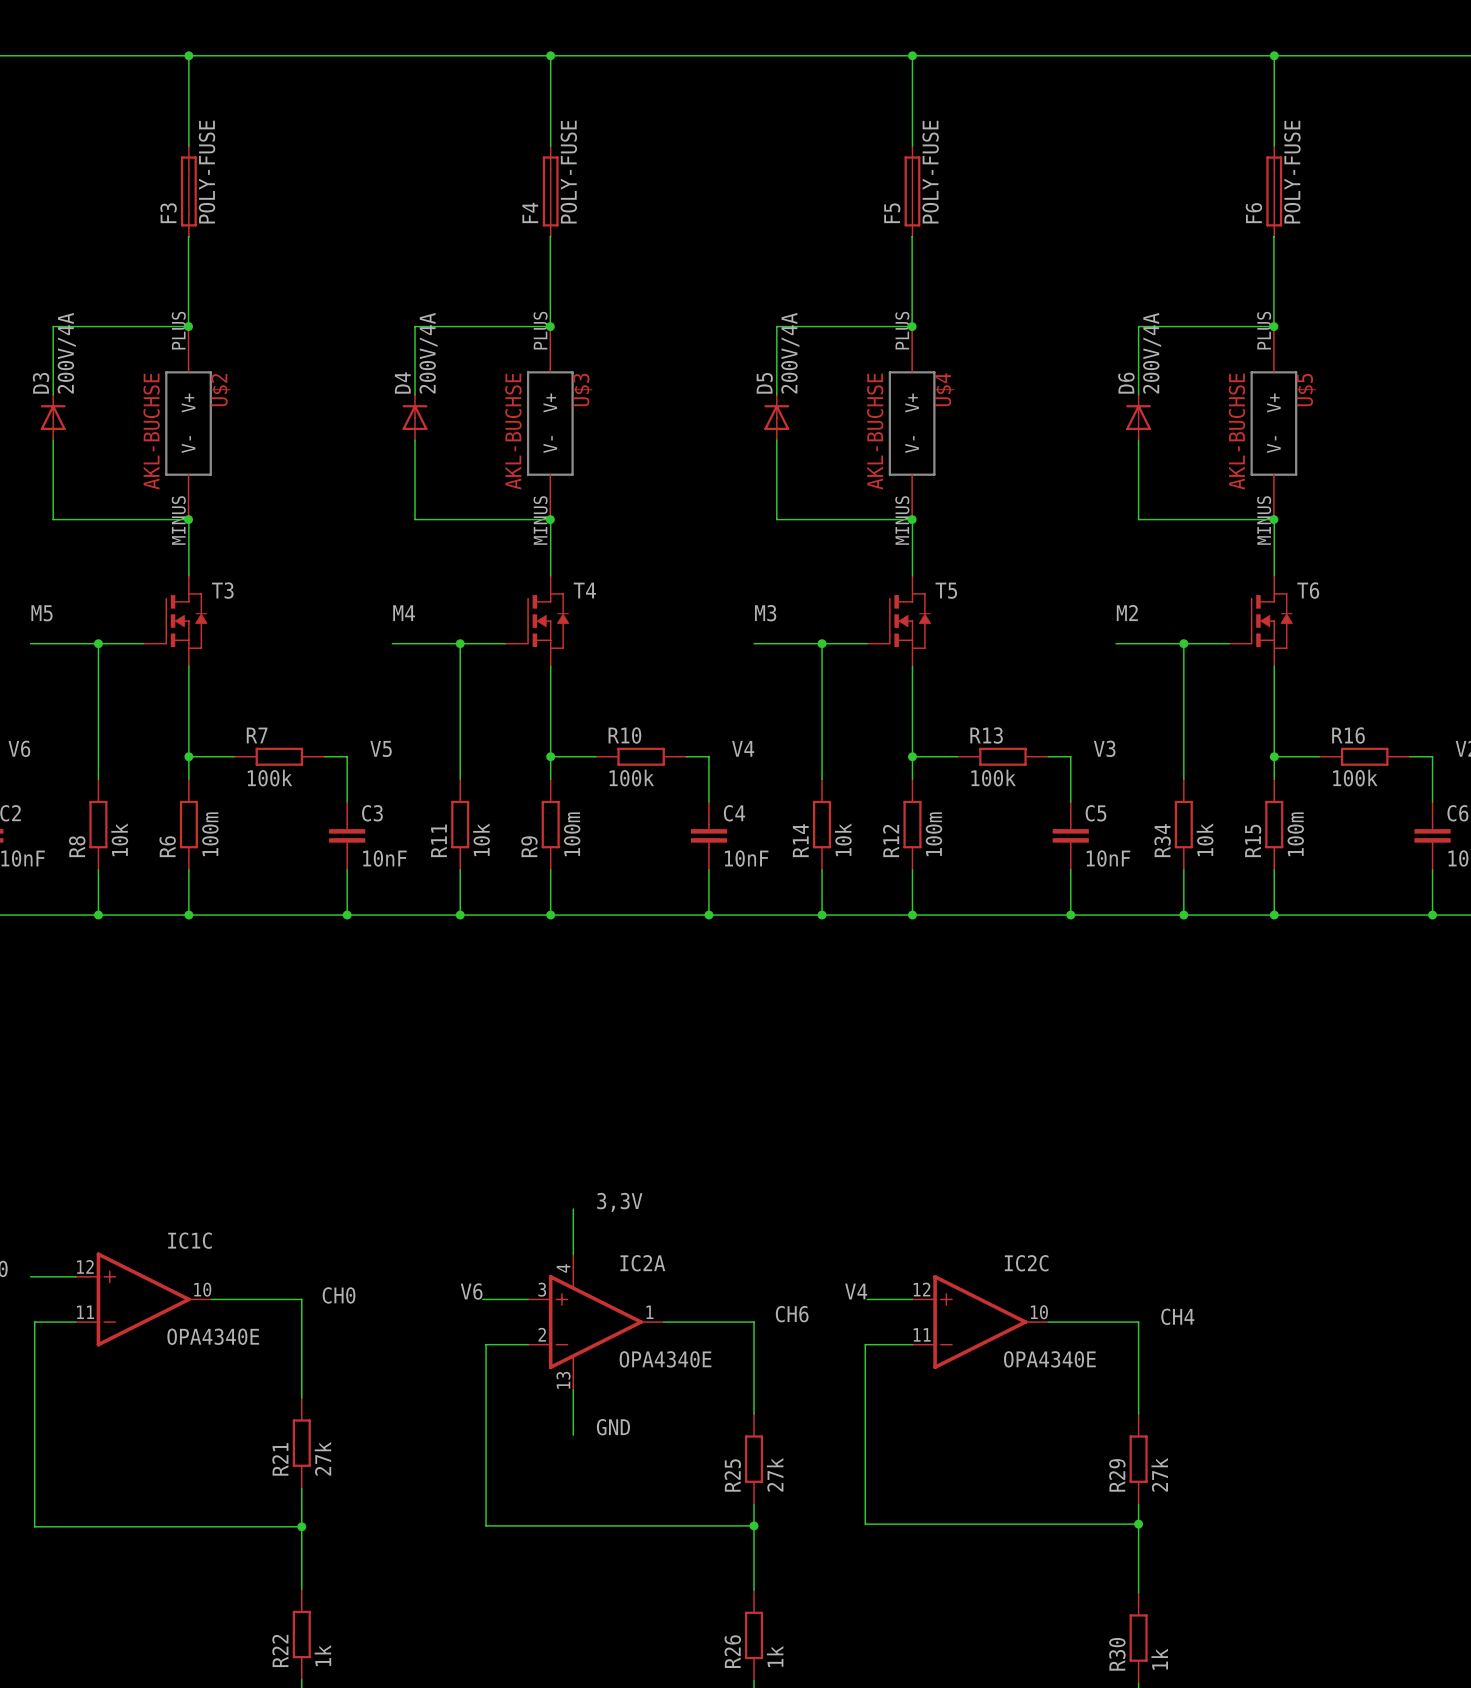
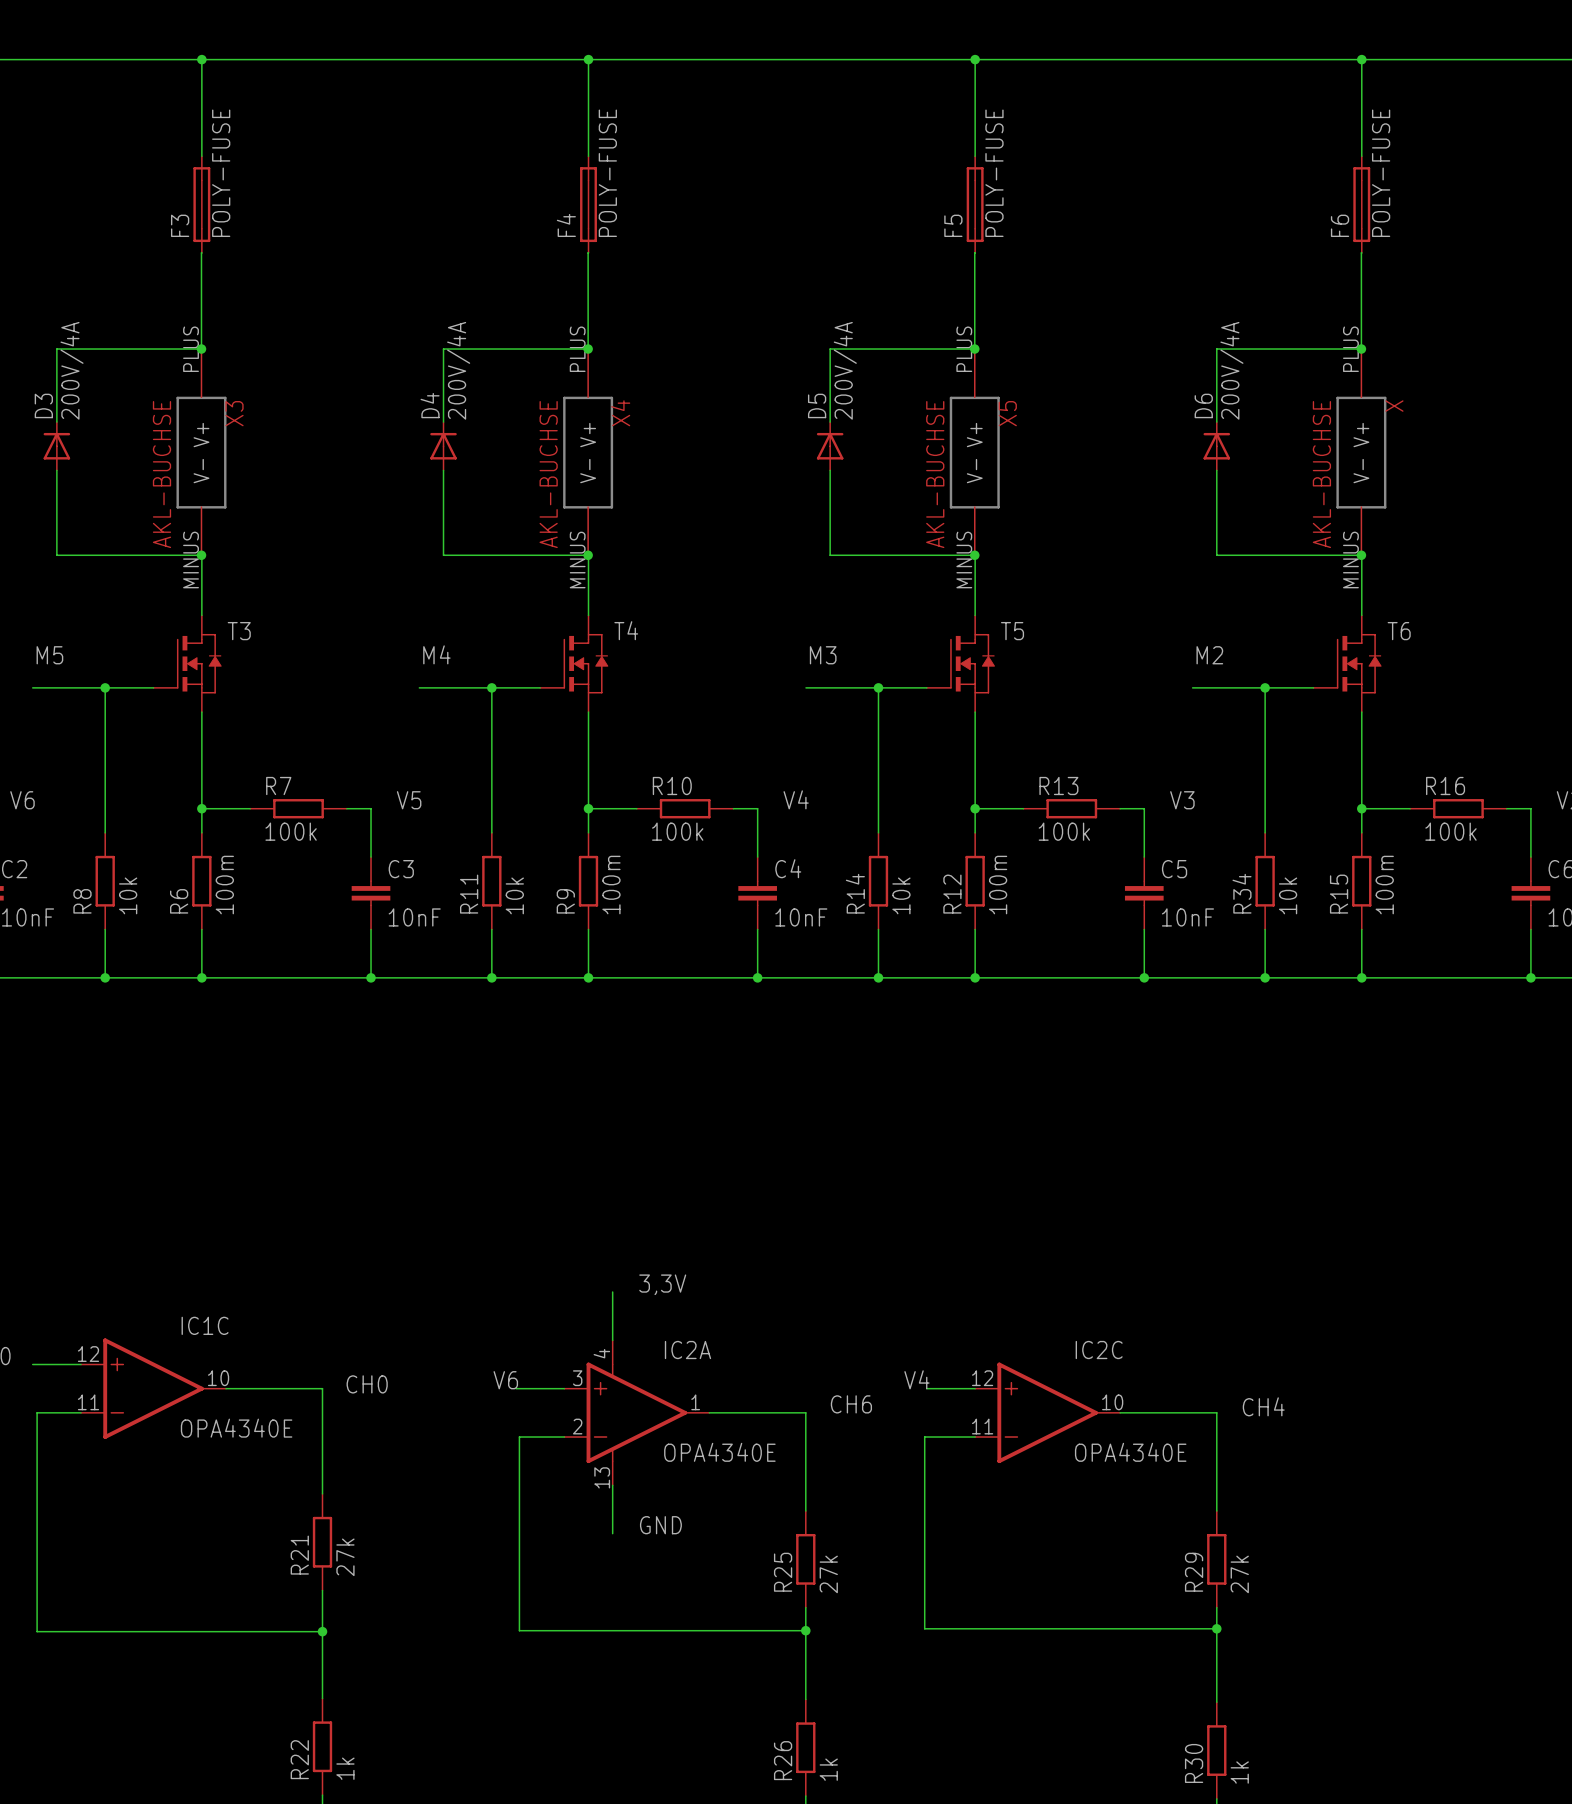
U$4 name: U$4 (944, 389) -> X5 (1007, 413)
U$2 name: U$2 (220, 390) -> X3 (234, 413)
U$3 name: U$3 (582, 390) -> X4 (620, 413)
U$5 name: U$5 (1306, 390) -> X (1394, 406)

